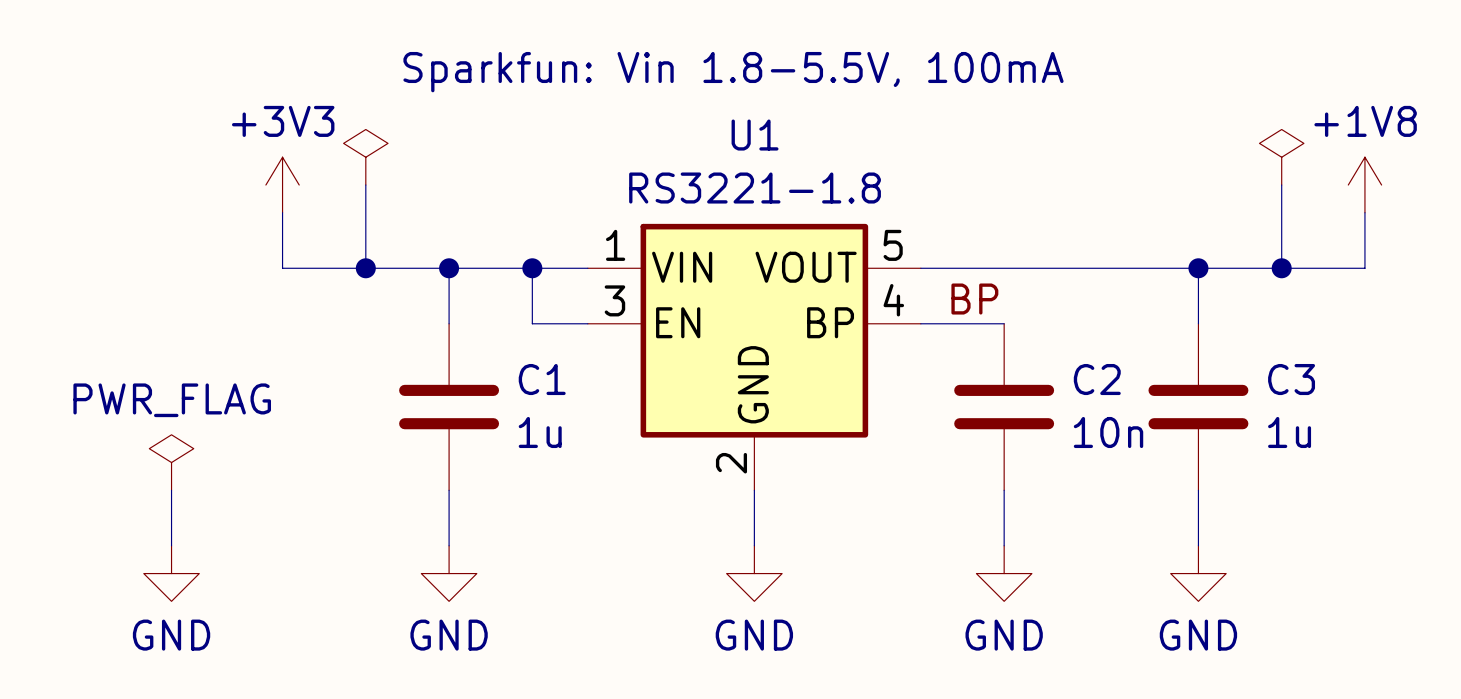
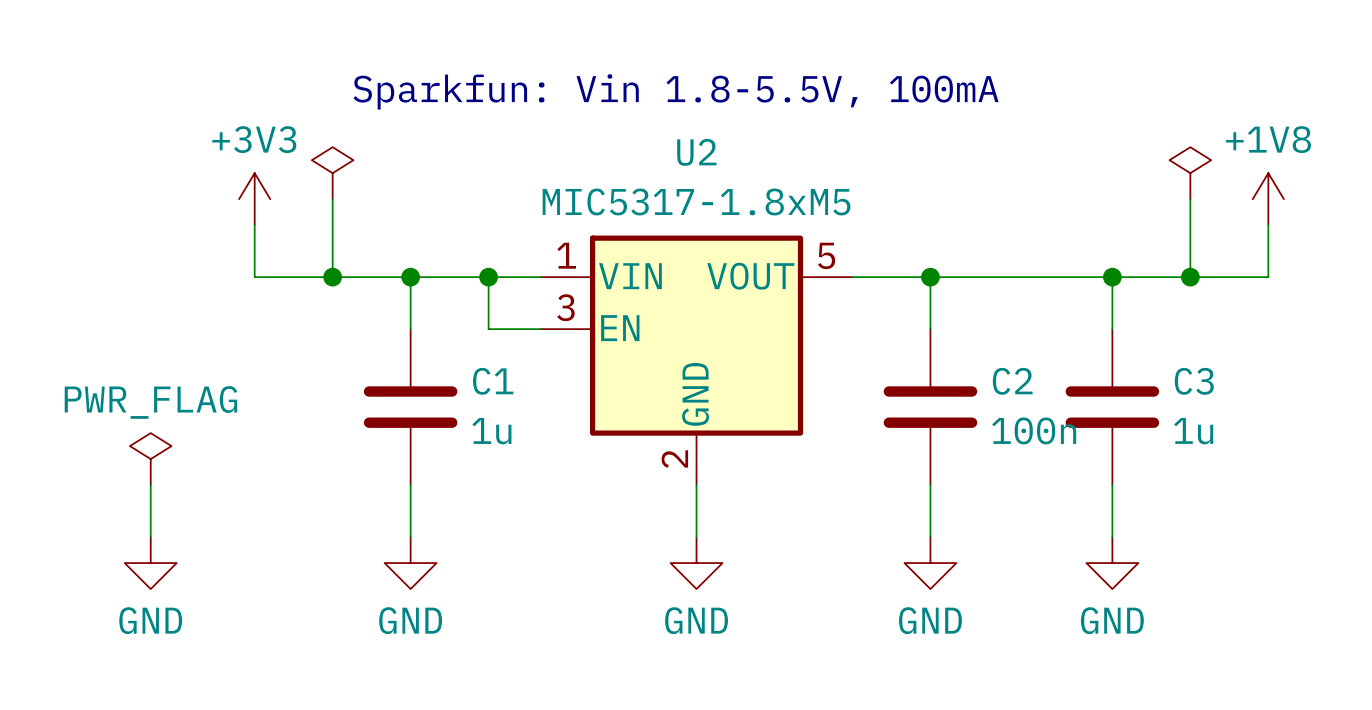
junction: none -> (930, 277)
label: BP (974, 299) -> none
wire: (920, 323) (1004, 323) -> (930, 277) (930, 329)
U1: RS3221-1.8 (754, 357) -> none
U2: none -> MIC5317-1.8xM5 (696, 360)
C2 value: 10n (1108, 432) -> 100n (1034, 430)

